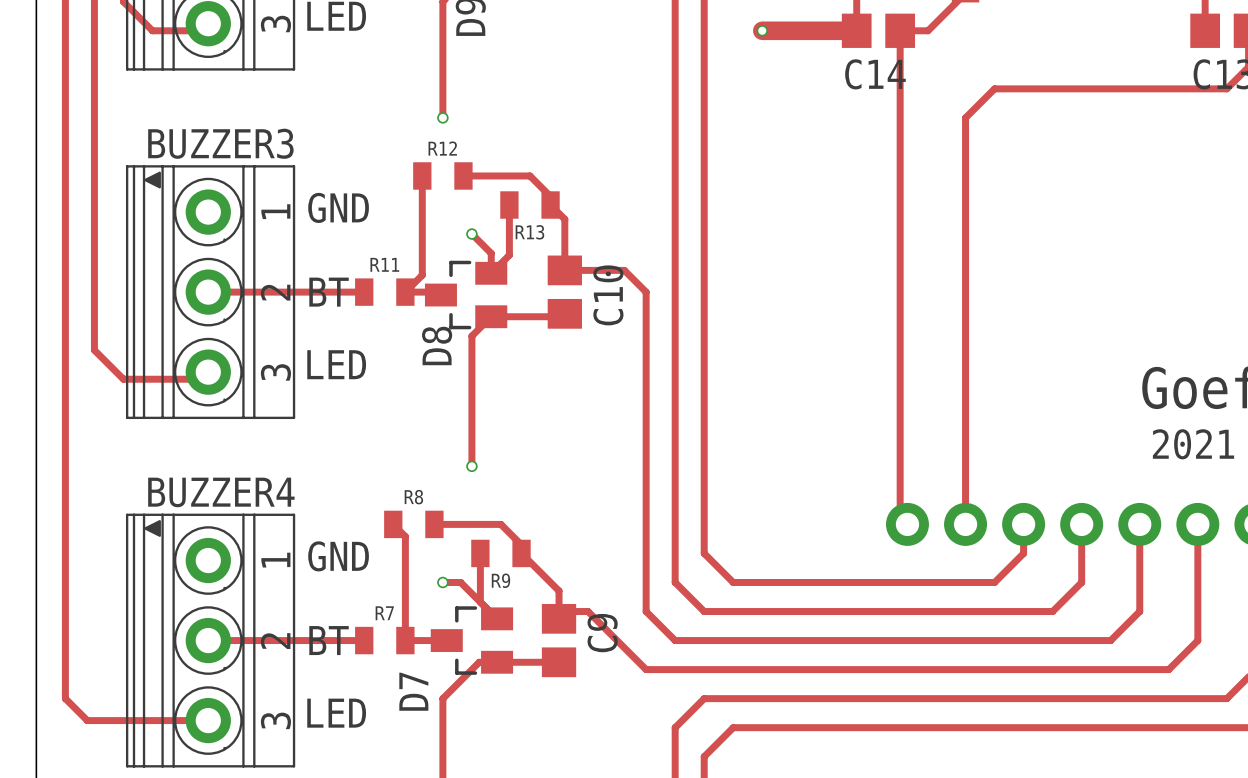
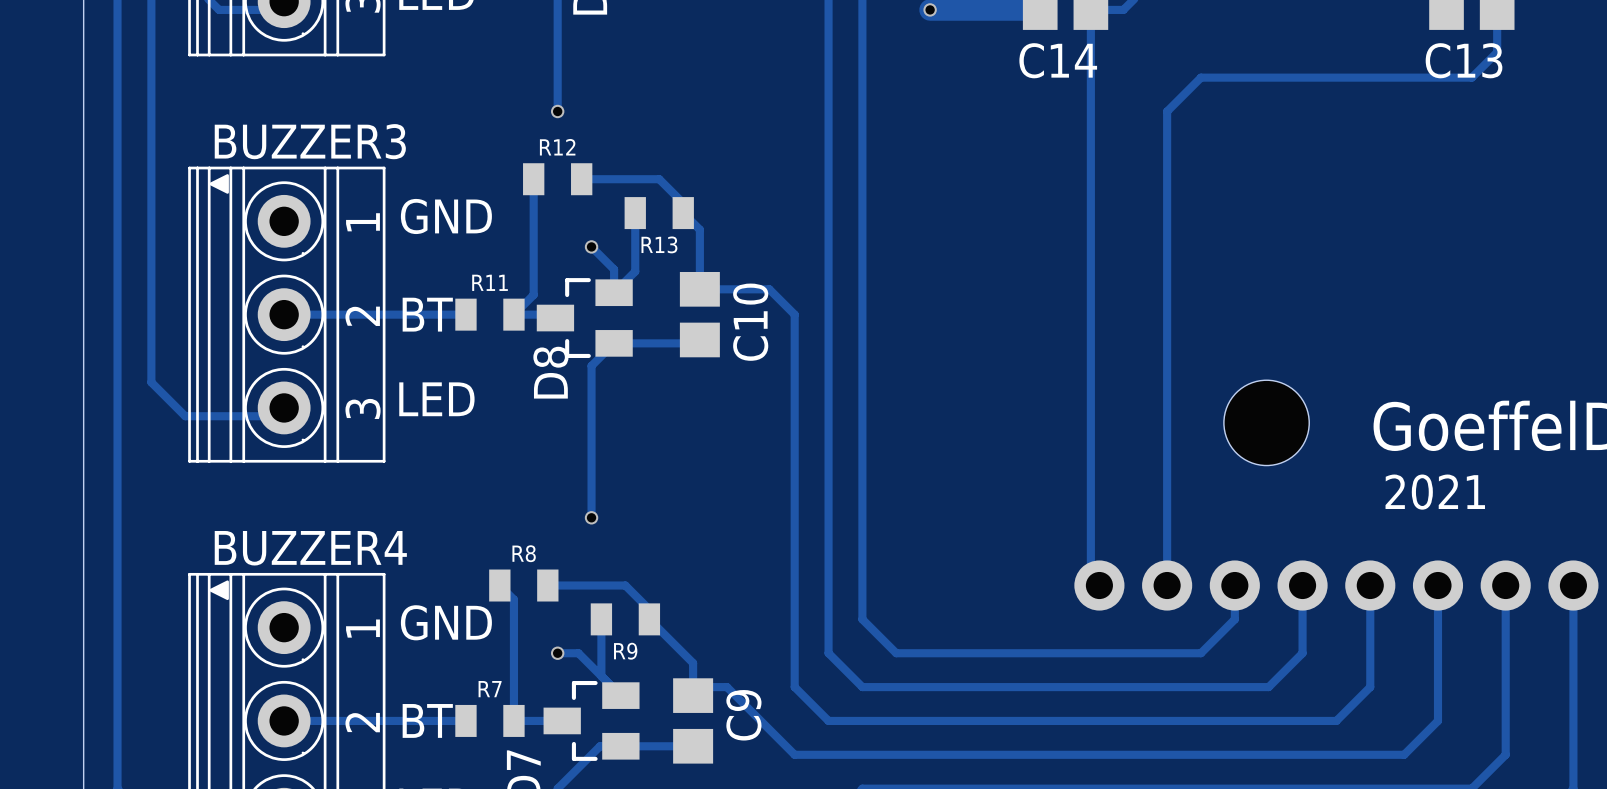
hole: none -> (1266, 422)

